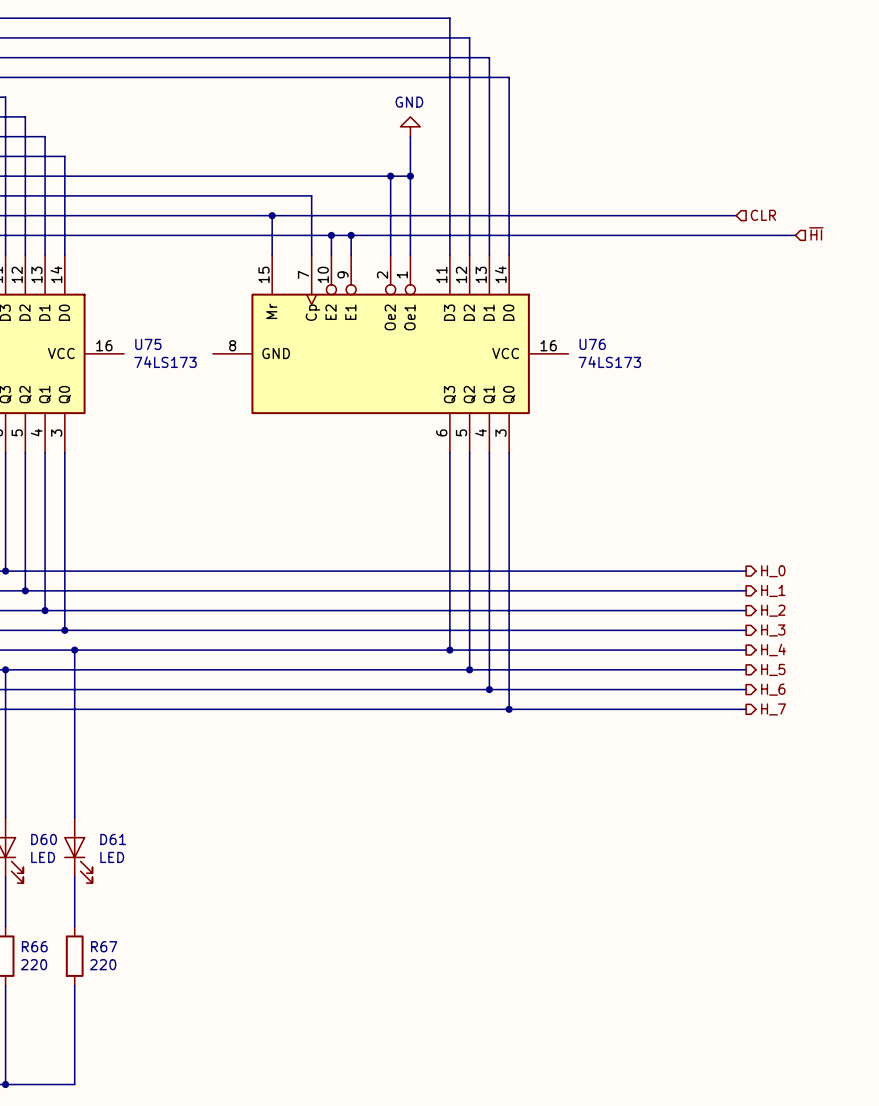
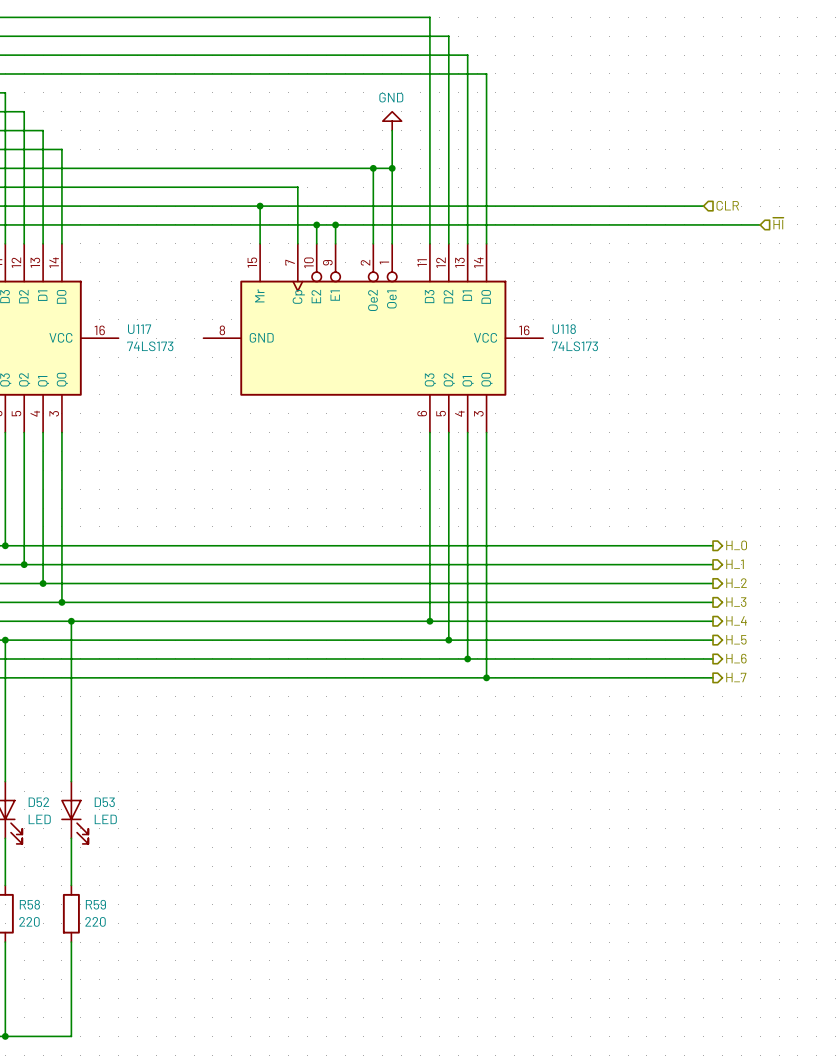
U75 name: U75 (148, 344) -> U117 (139, 329)
U76 name: U76 (592, 344) -> U118 (564, 329)
D60 name: D60 (44, 839) -> D52 (38, 802)
D61 name: D61 (113, 839) -> D53 (104, 802)
R66 name: R66 (34, 946) -> R58 (29, 904)
R67 name: R67 (104, 946) -> R59 (95, 904)

